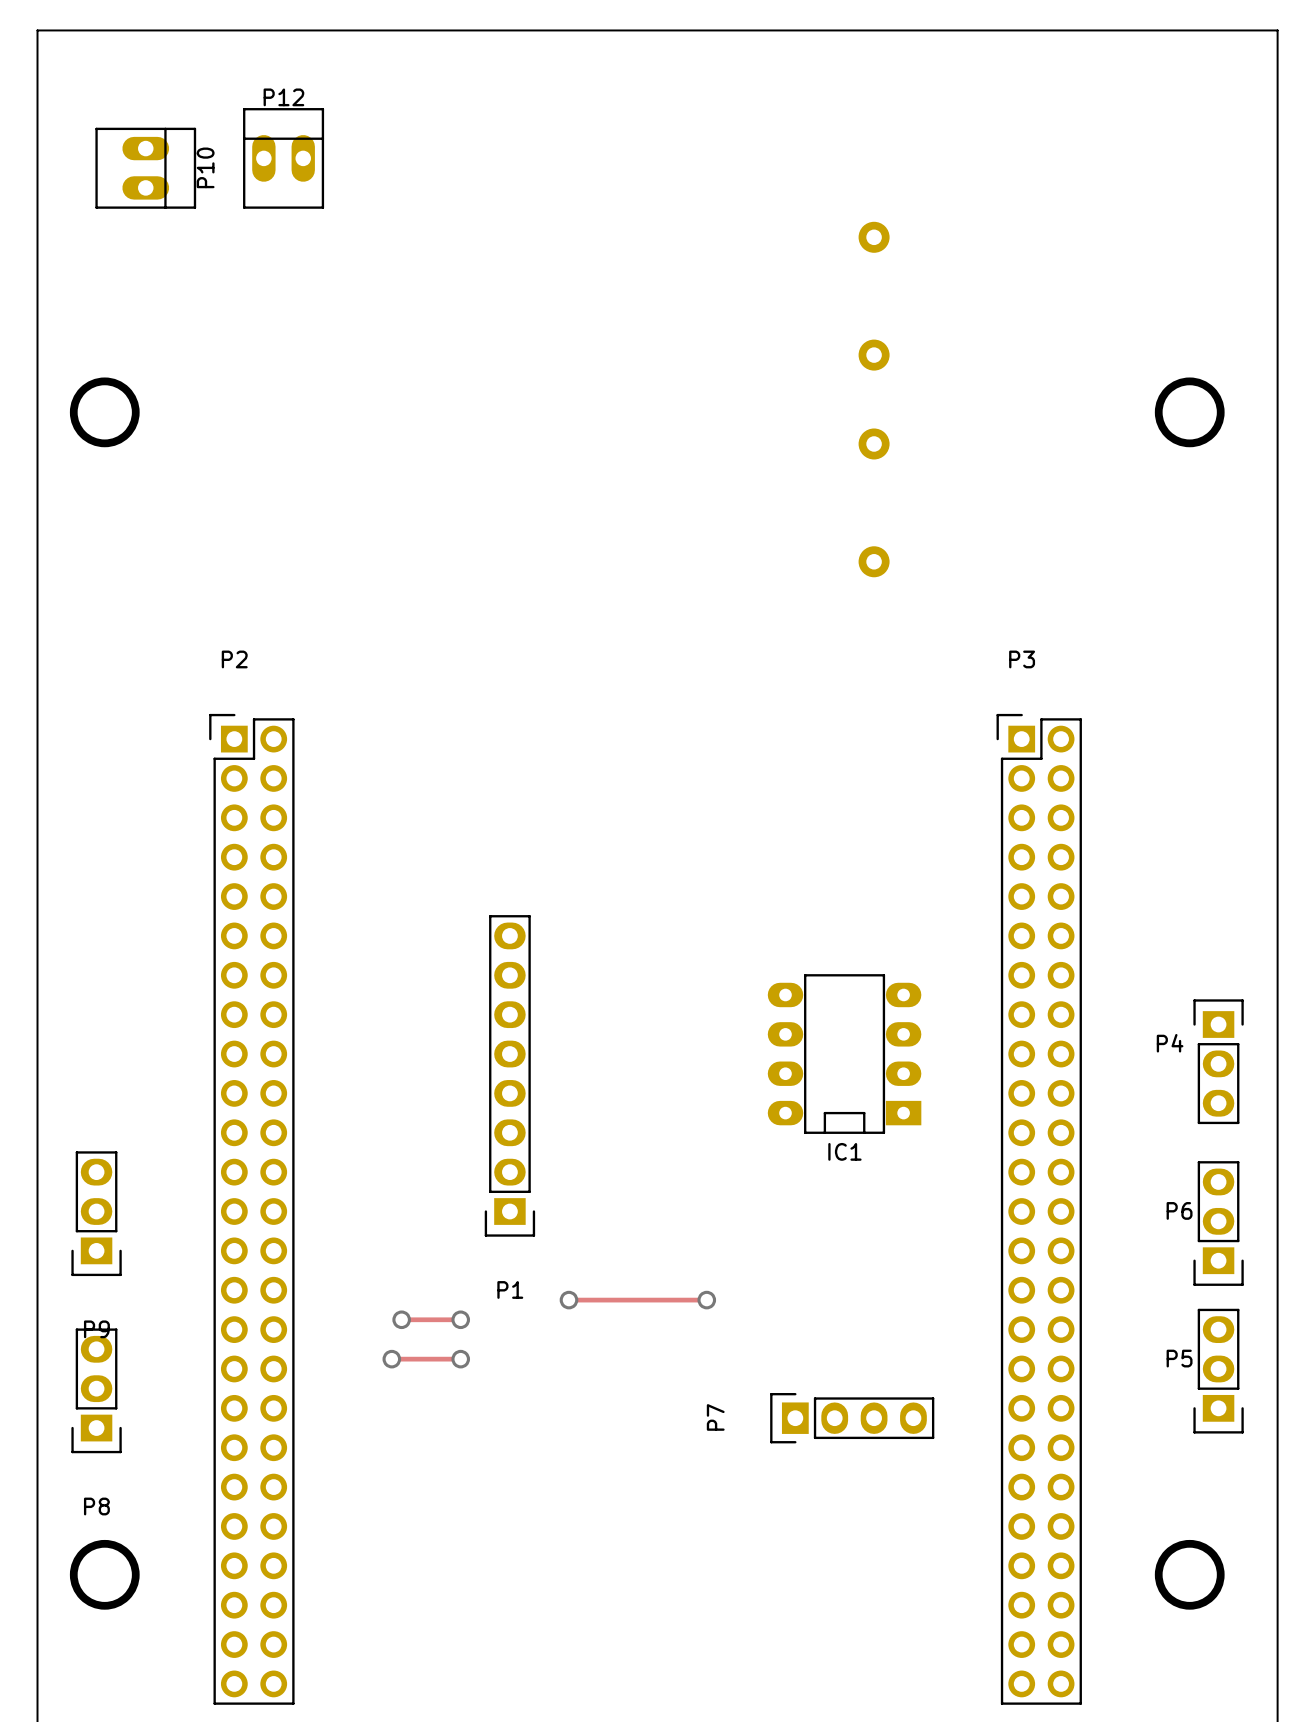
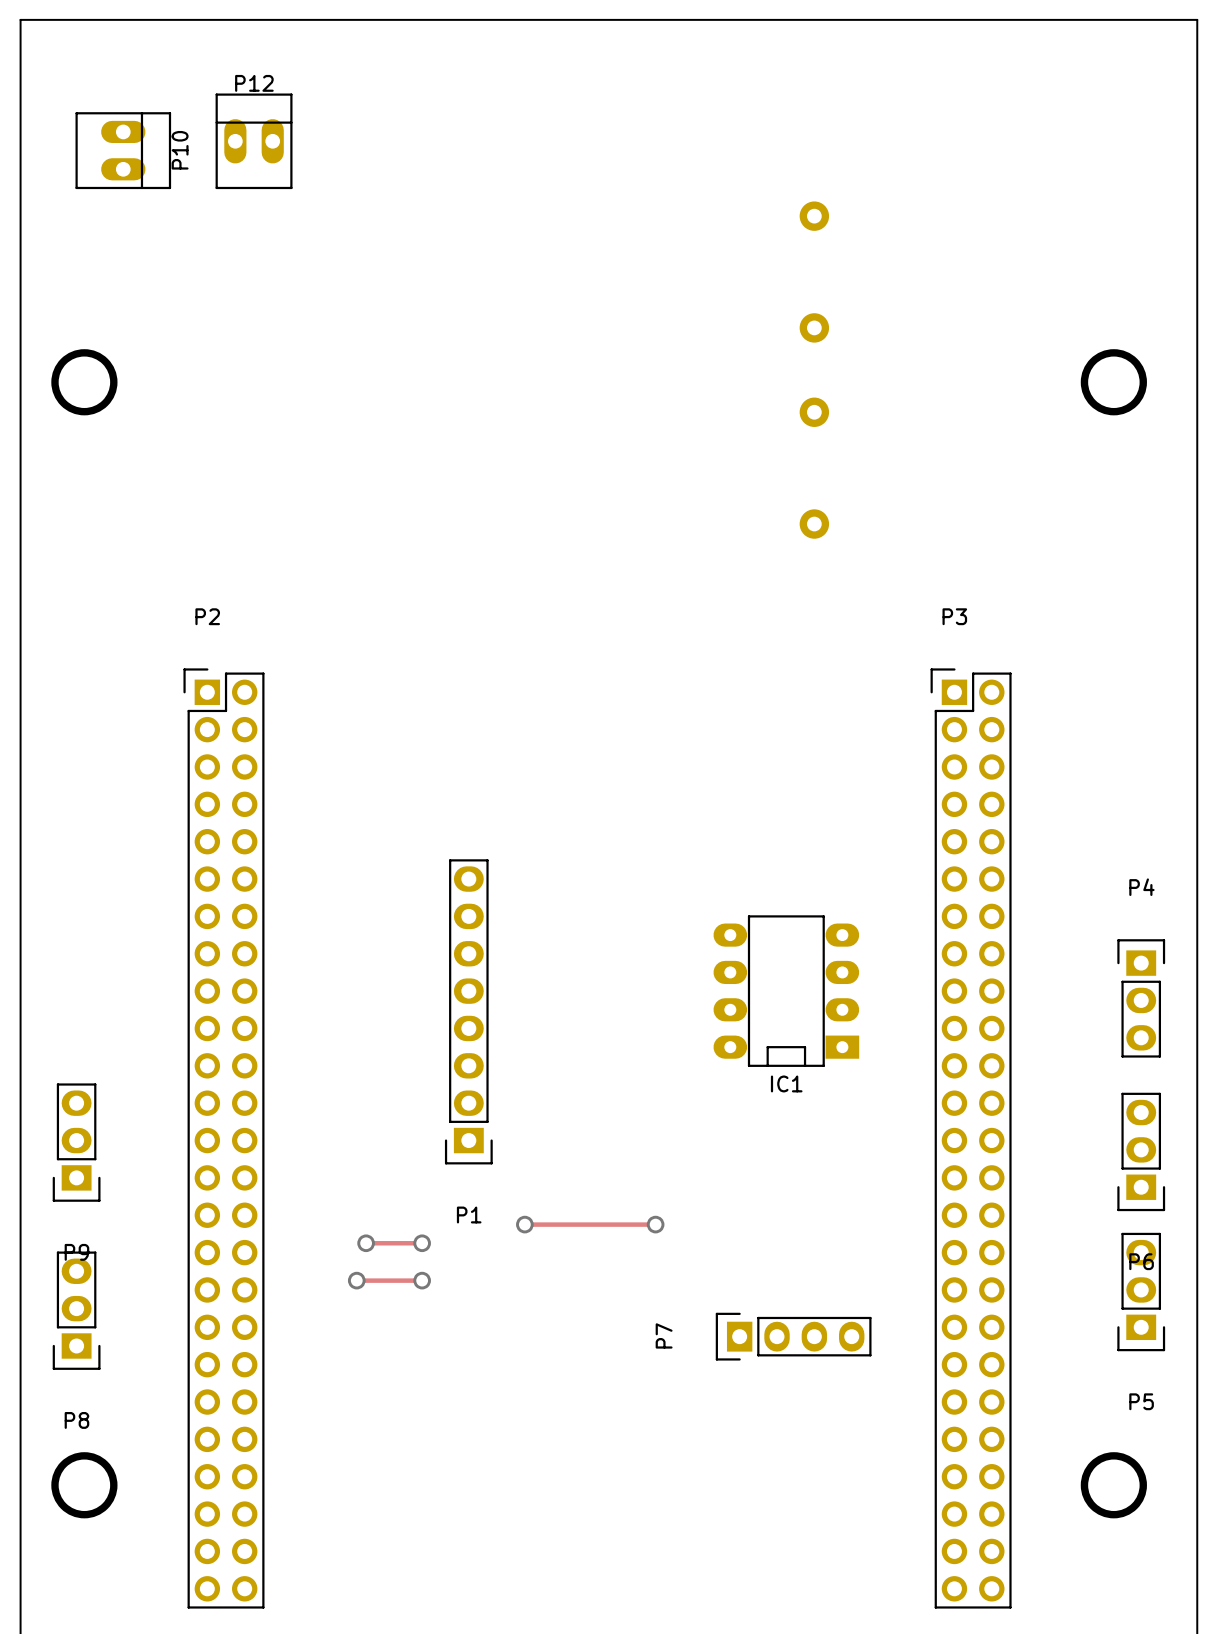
P4 name position: P4 (1170, 1043) -> P4 (1141, 887)
P6 name position: P6 (1179, 1210) -> P6 (1141, 1261)
P5 name position: P5 (1179, 1358) -> P5 (1141, 1401)

